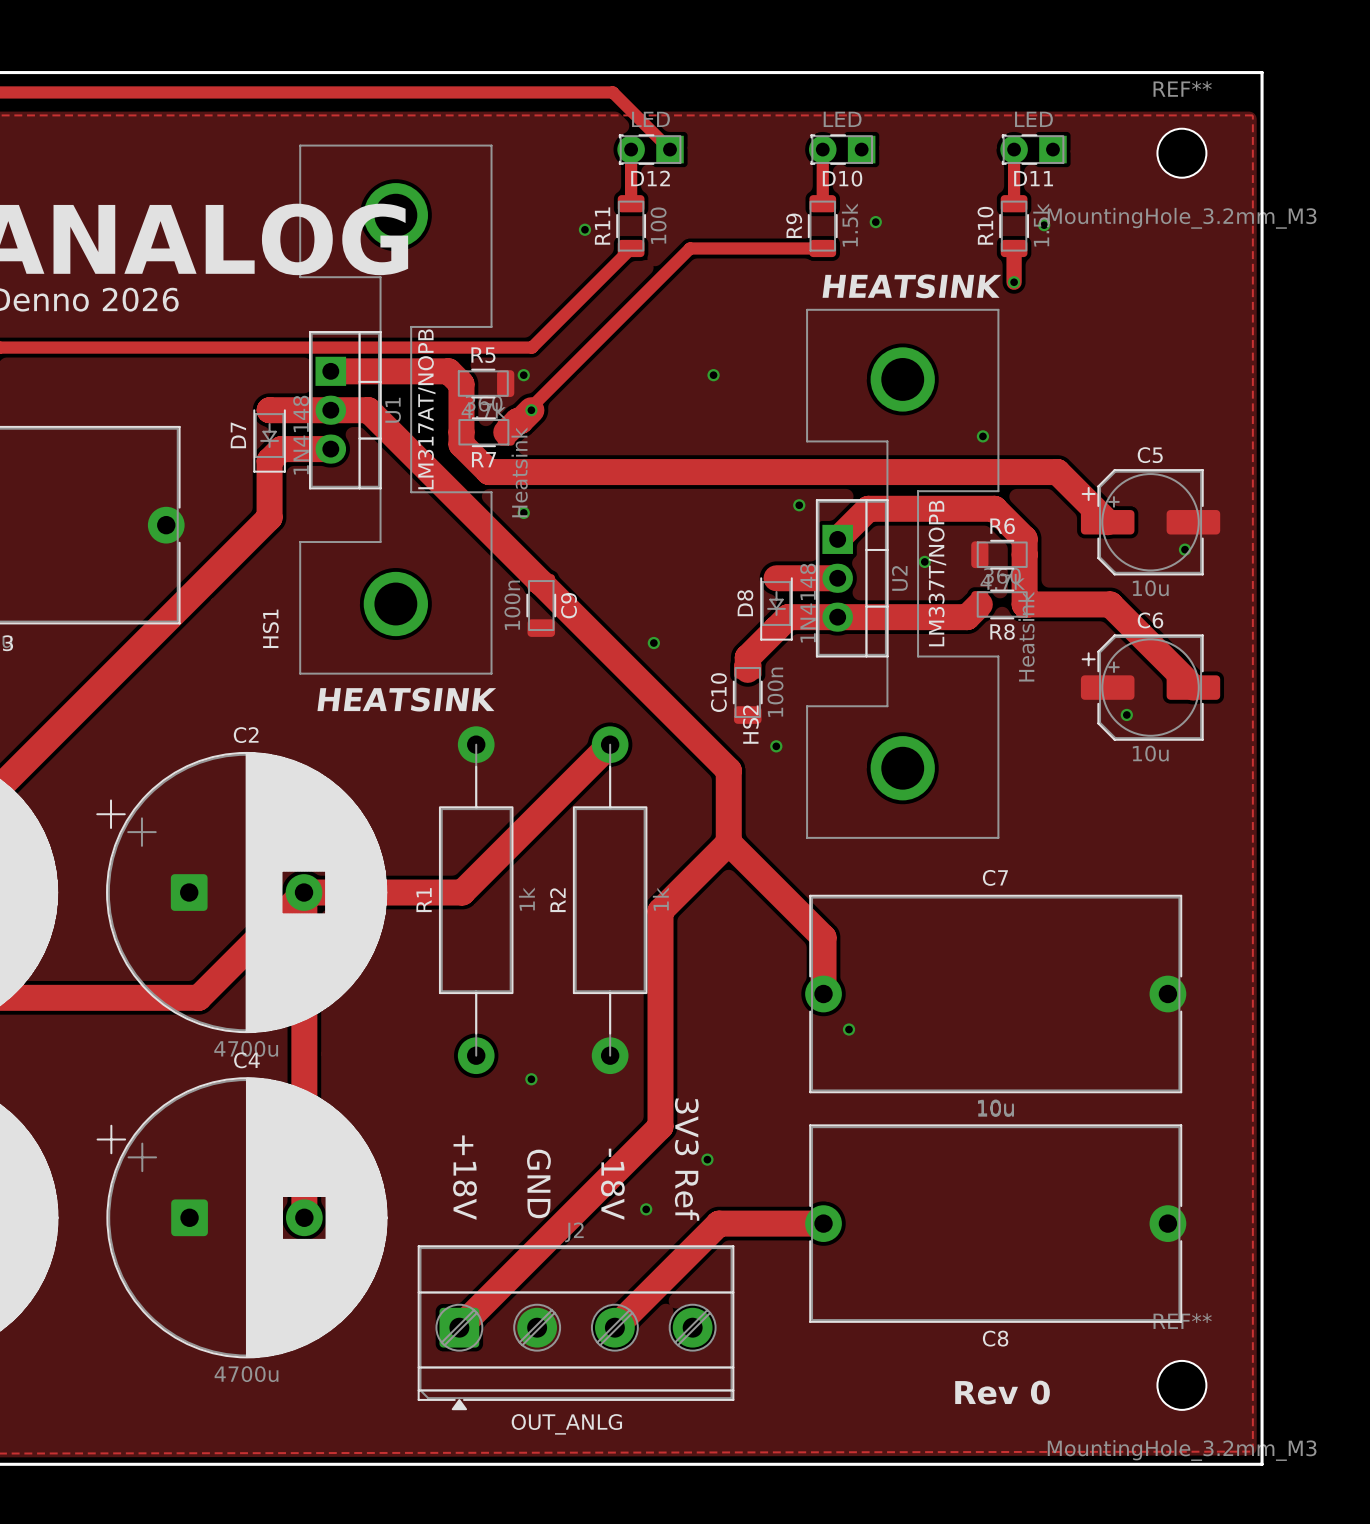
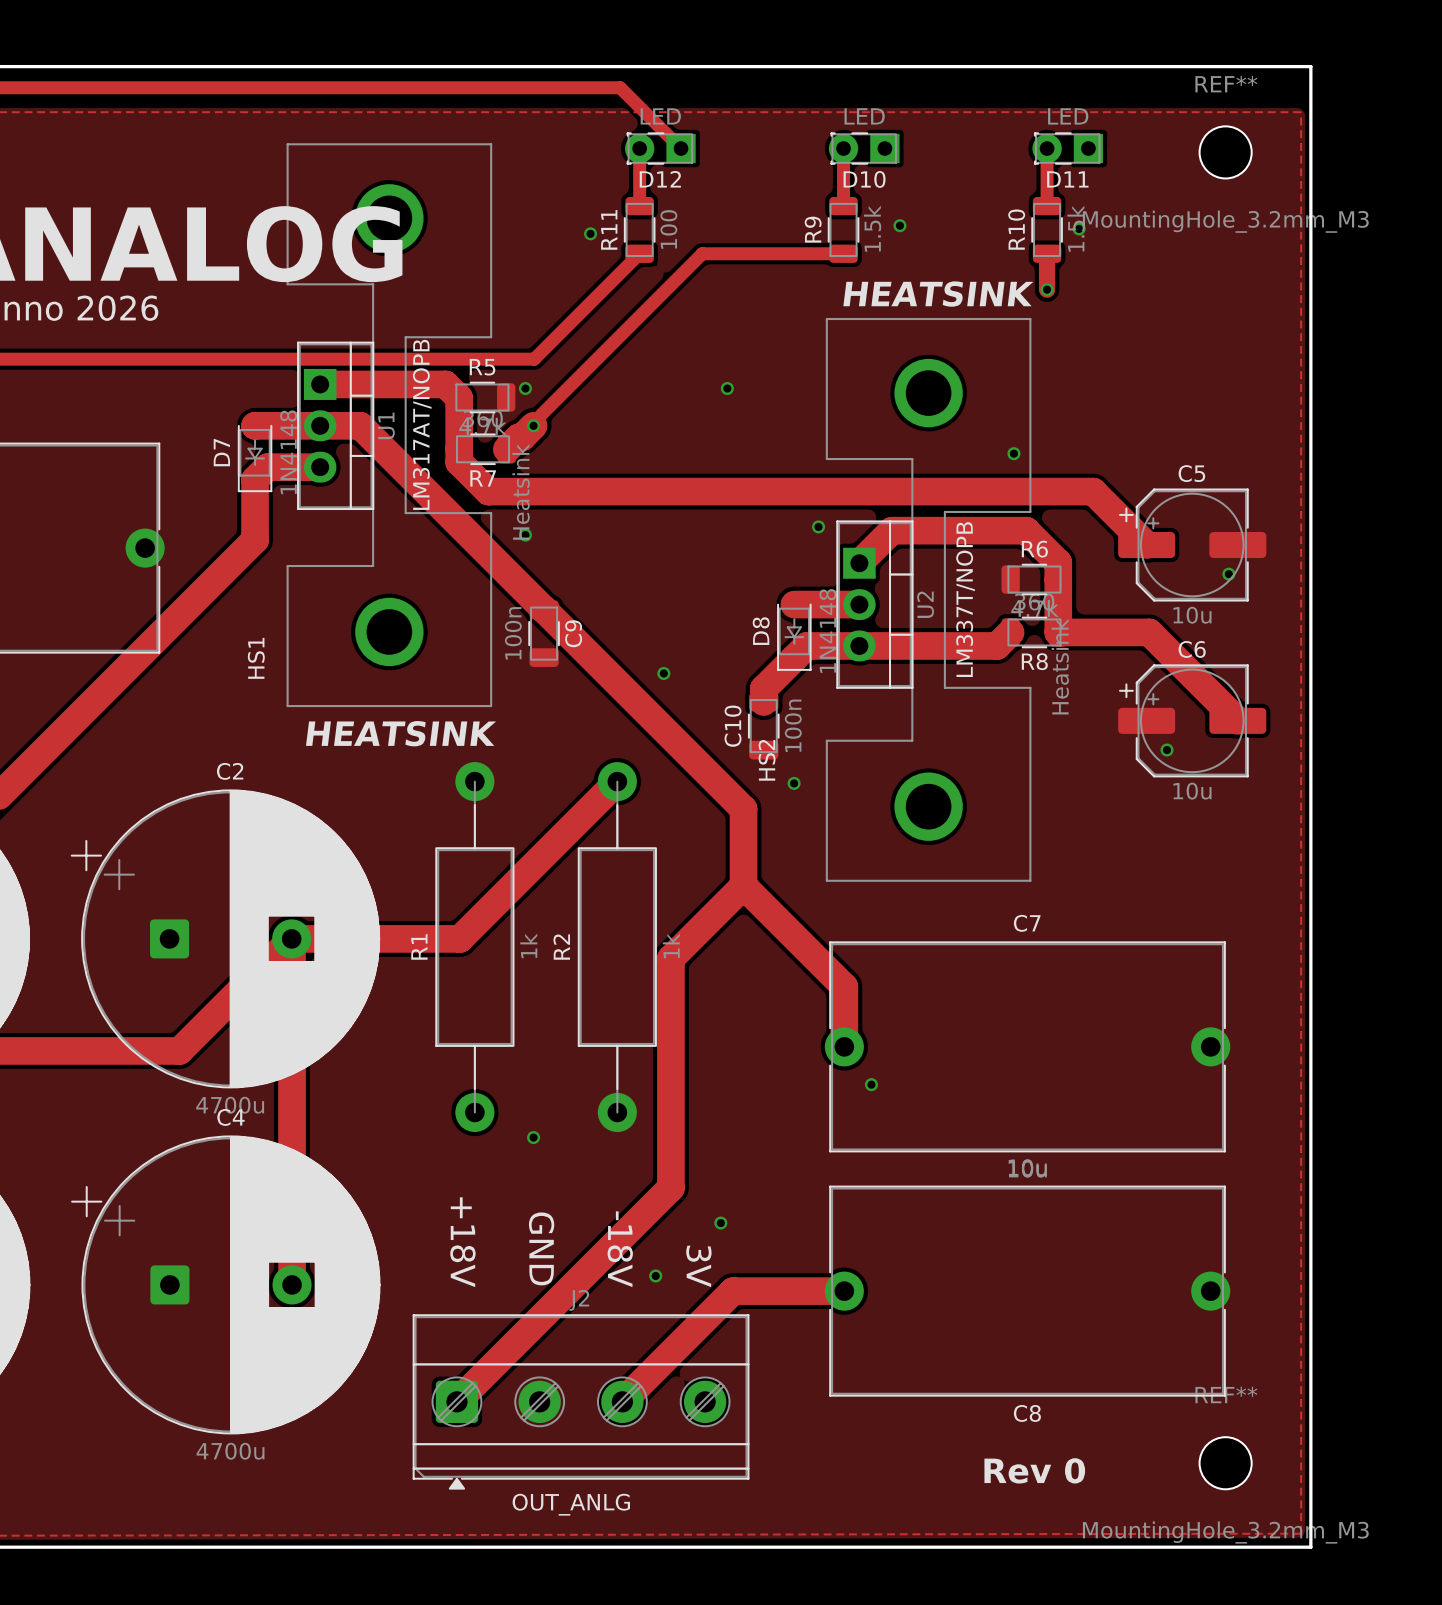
via: (924, 561) -> none
text: 3V3 Ref (687, 1159) -> 3V (698, 1266)

